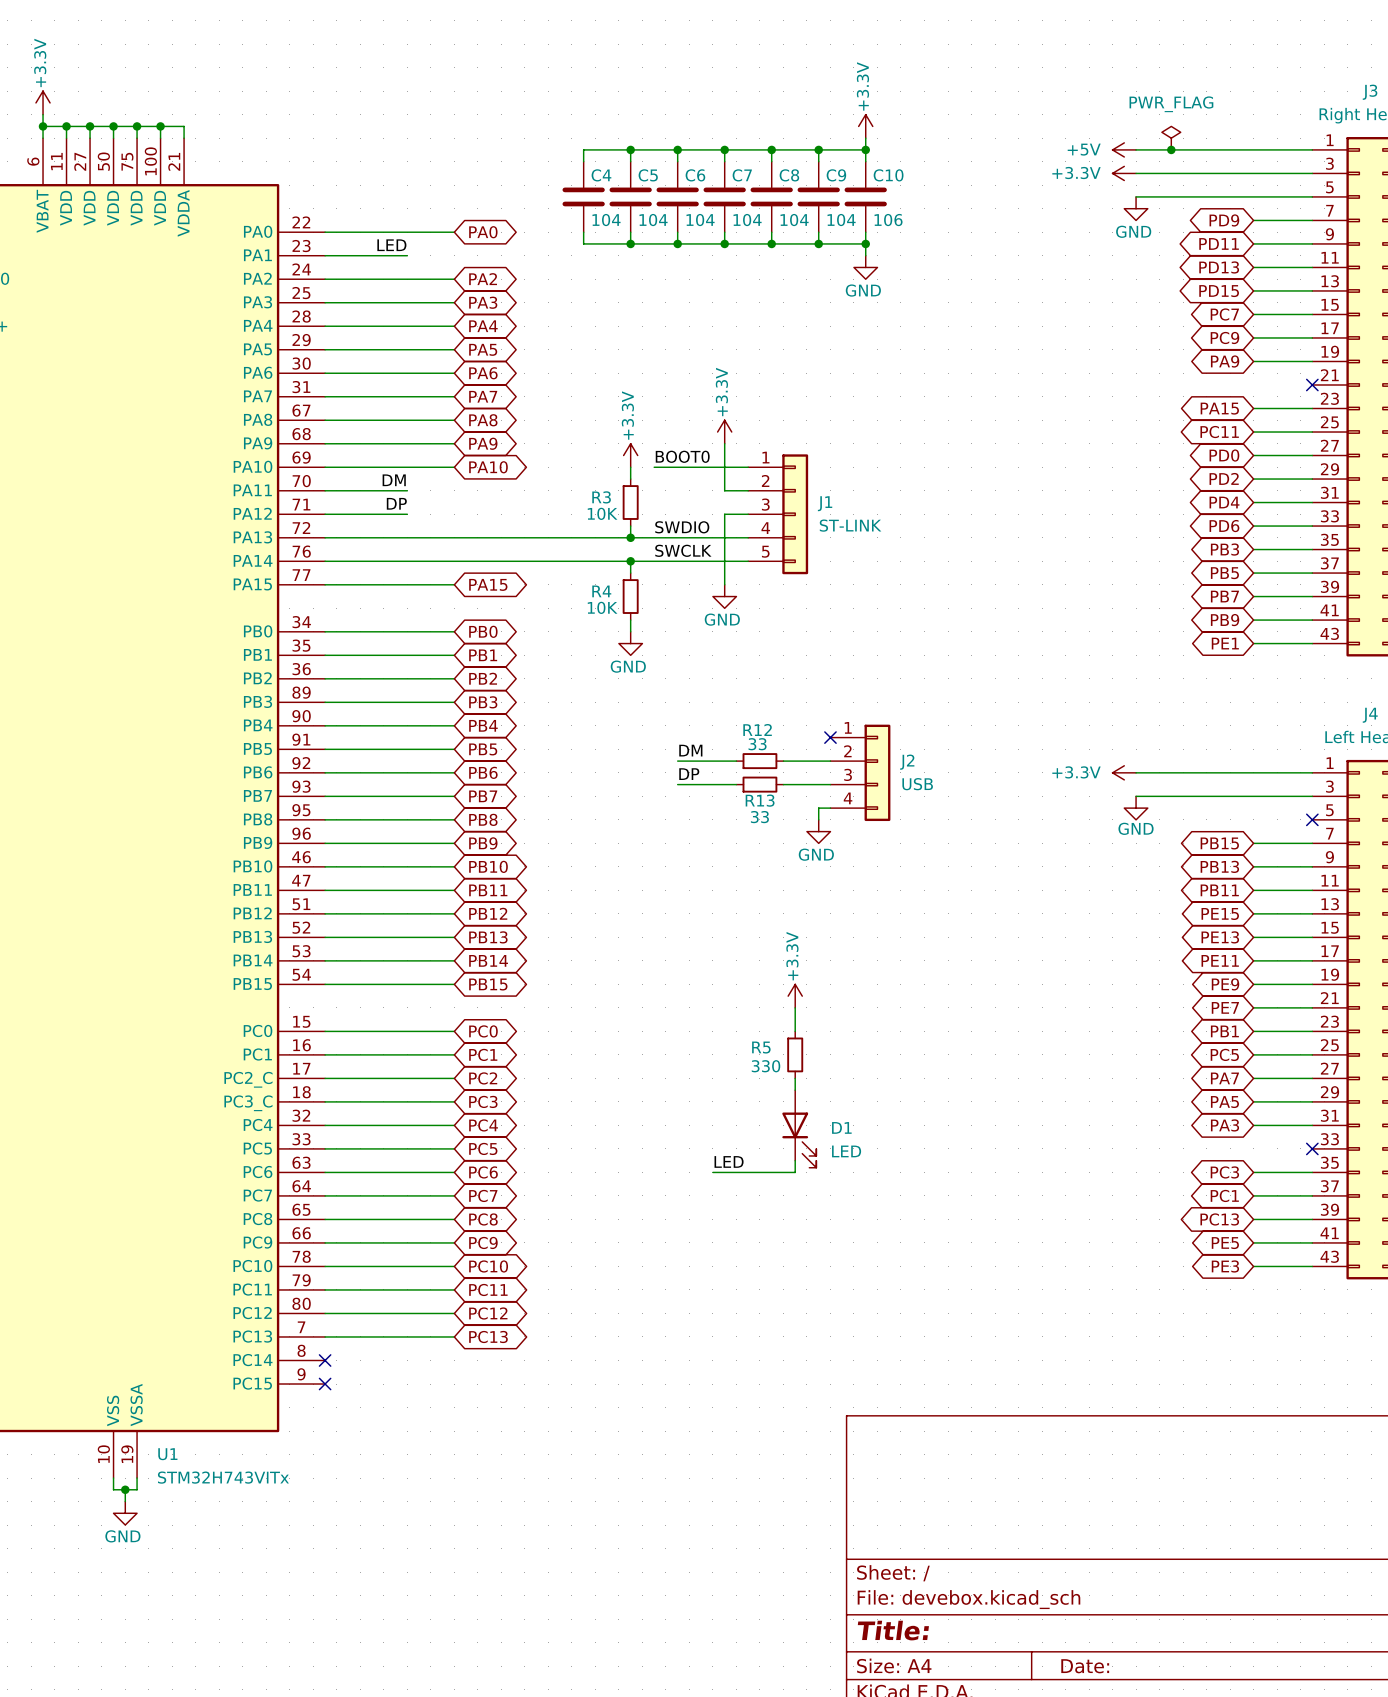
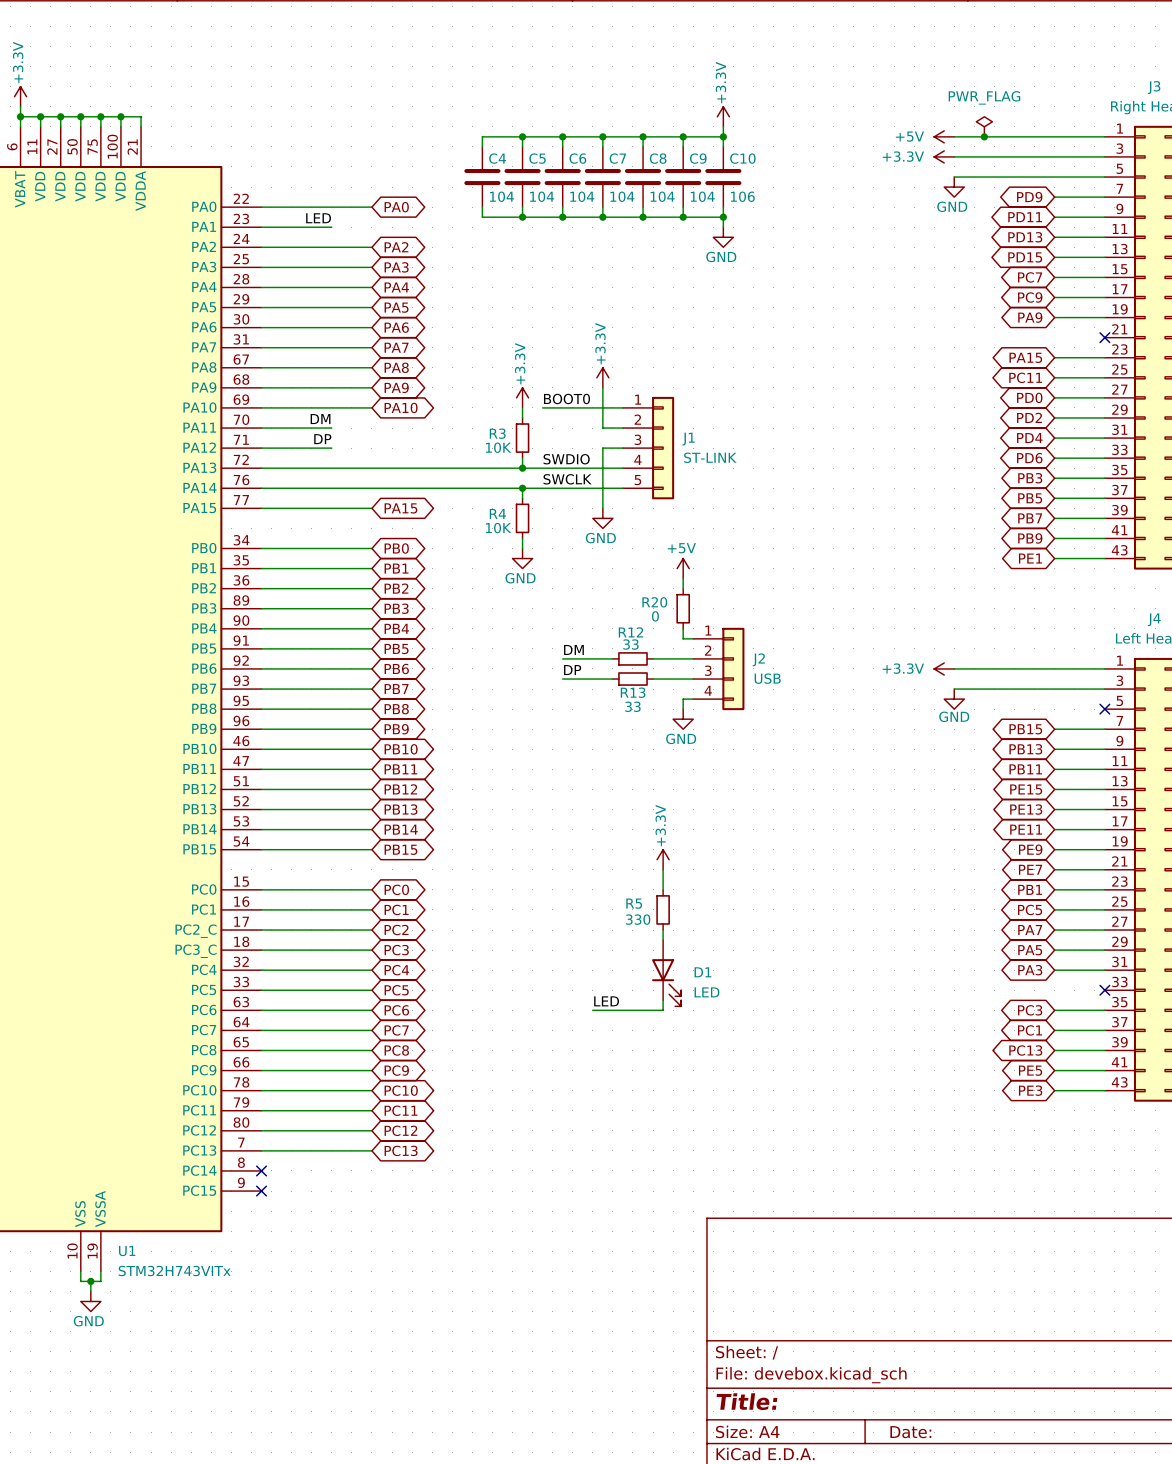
power symbol: none -> +5V (683, 568)
wire: none -> (683, 578) (683, 588)
R20: none -> 0 (683, 608)
wire: none -> (683, 628) (683, 638) (693, 638)
no-connect mark: (830, 737) -> none

